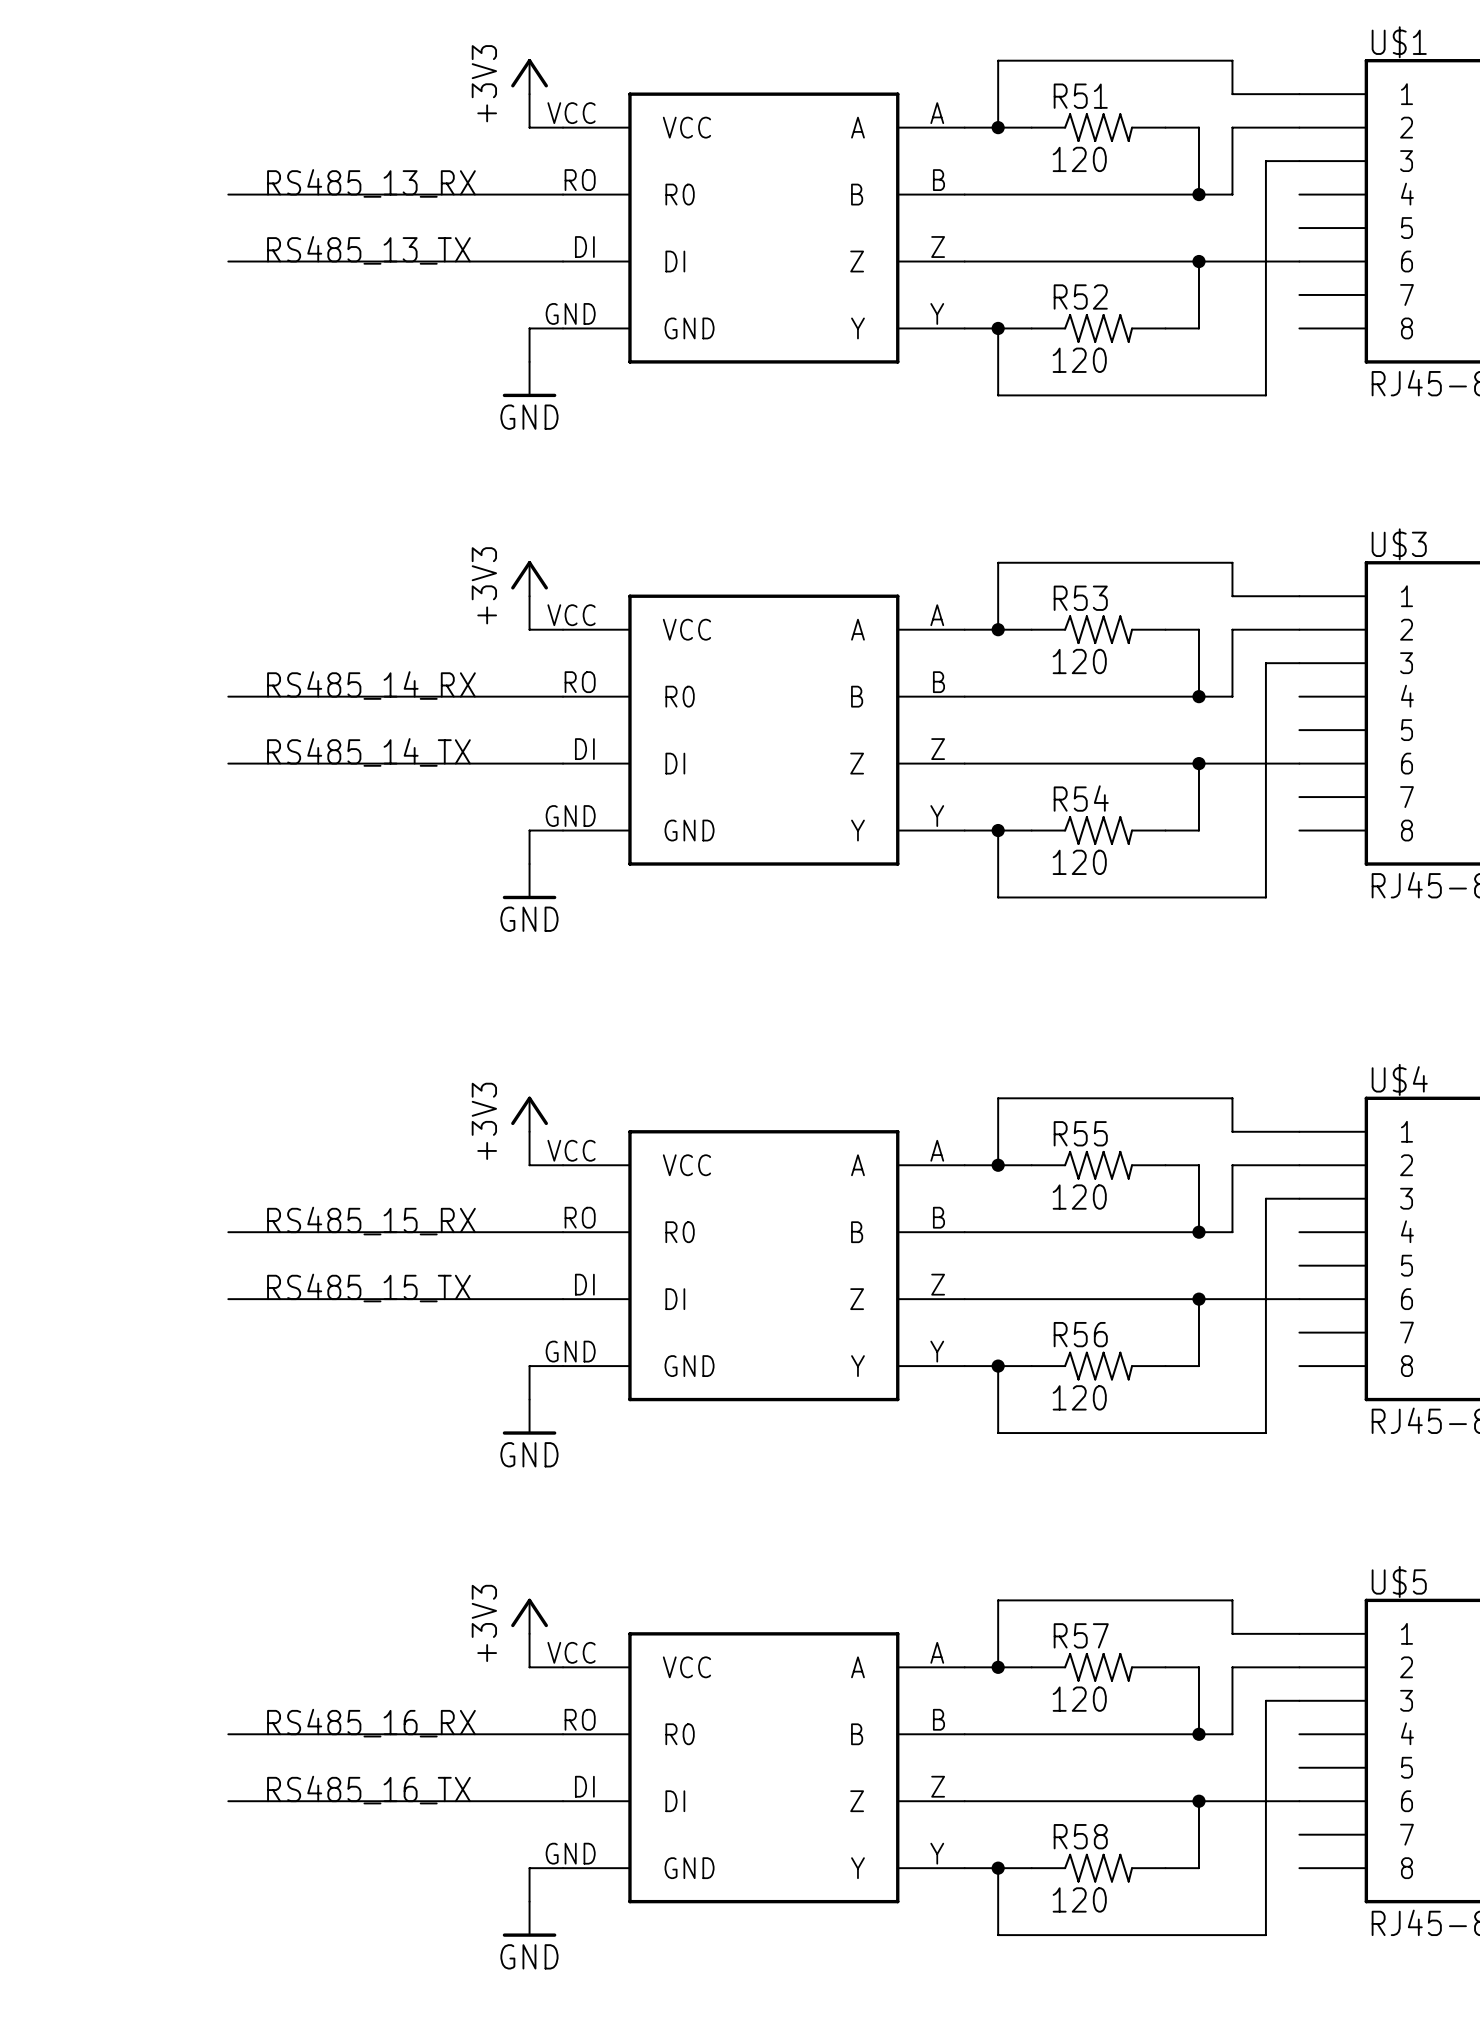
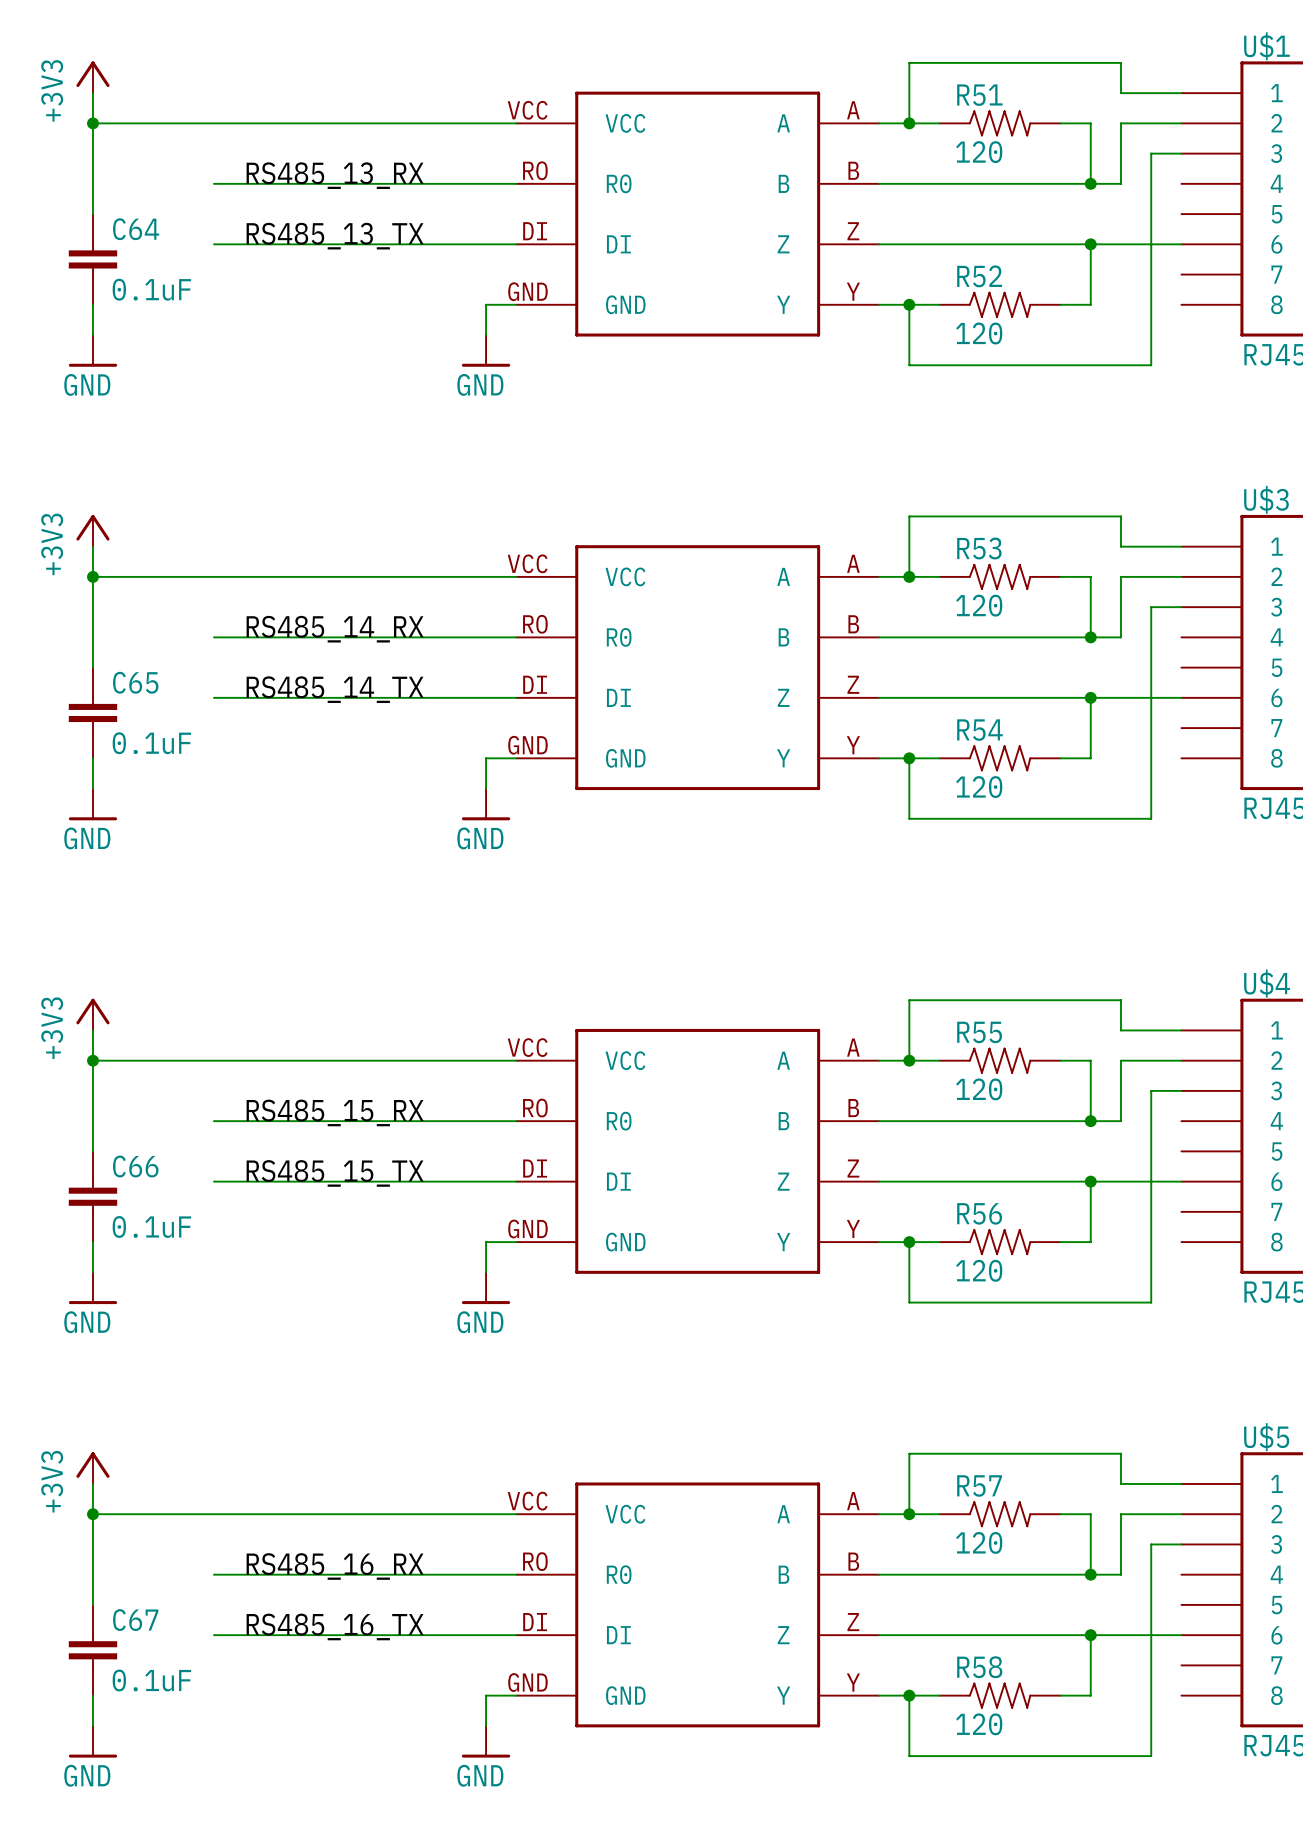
power symbol: none -> +3V3 (92, 77)
power symbol: +3V3 (529, 76) -> none
wire: none -> (92, 93) (92, 214)
wire: (529, 94) (529, 127) -> (92, 123) (486, 123)
junction: none -> (92, 123)
C64: none -> 0.1uF (92, 259)
wire: none -> (92, 304) (92, 335)
power symbol: none -> GND (92, 350)
power symbol: none -> +3V3 (92, 530)
power symbol: +3V3 (529, 578) -> none
wire: none -> (92, 546) (92, 667)
wire: (529, 596) (529, 629) -> (92, 576) (486, 576)
junction: none -> (92, 576)
C65: none -> 0.1uF (92, 712)
wire: none -> (92, 758) (92, 788)
power symbol: none -> GND (92, 804)
power symbol: none -> +3V3 (92, 1014)
power symbol: +3V3 (529, 1114) -> none
wire: none -> (92, 1030) (92, 1151)
wire: (529, 1131) (529, 1165) -> (92, 1060) (486, 1060)
junction: none -> (92, 1060)
C66: none -> 0.1uF (92, 1196)
wire: none -> (92, 1242) (92, 1272)
power symbol: none -> GND (92, 1288)
power symbol: none -> +3V3 (92, 1468)
power symbol: +3V3 (529, 1616) -> none
wire: none -> (92, 1483) (92, 1604)
wire: (529, 1633) (529, 1667) -> (92, 1514) (486, 1514)
junction: none -> (92, 1514)
C67: none -> 0.1uF (92, 1650)
wire: none -> (92, 1695) (92, 1725)
power symbol: none -> GND (92, 1741)

